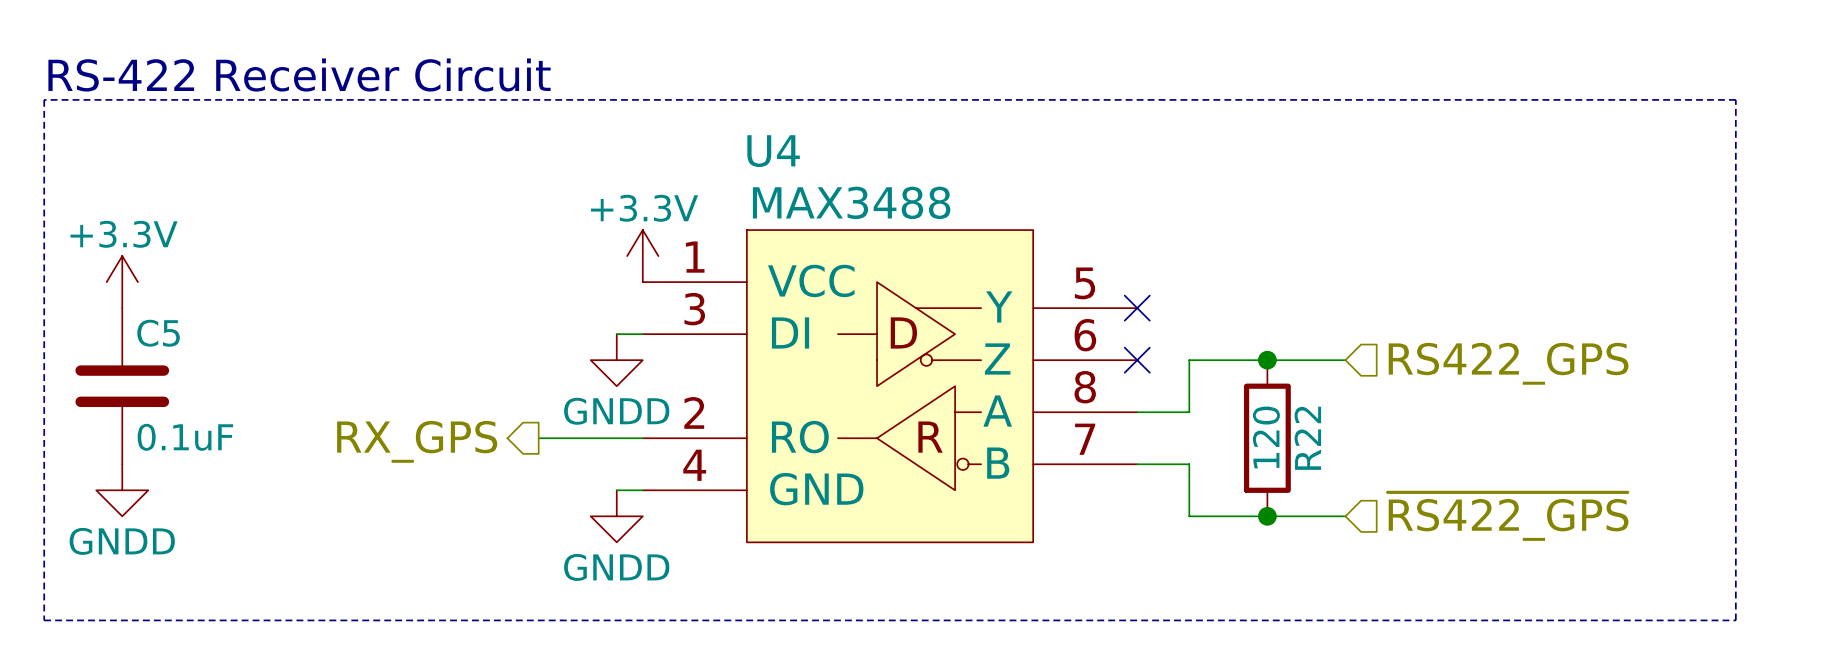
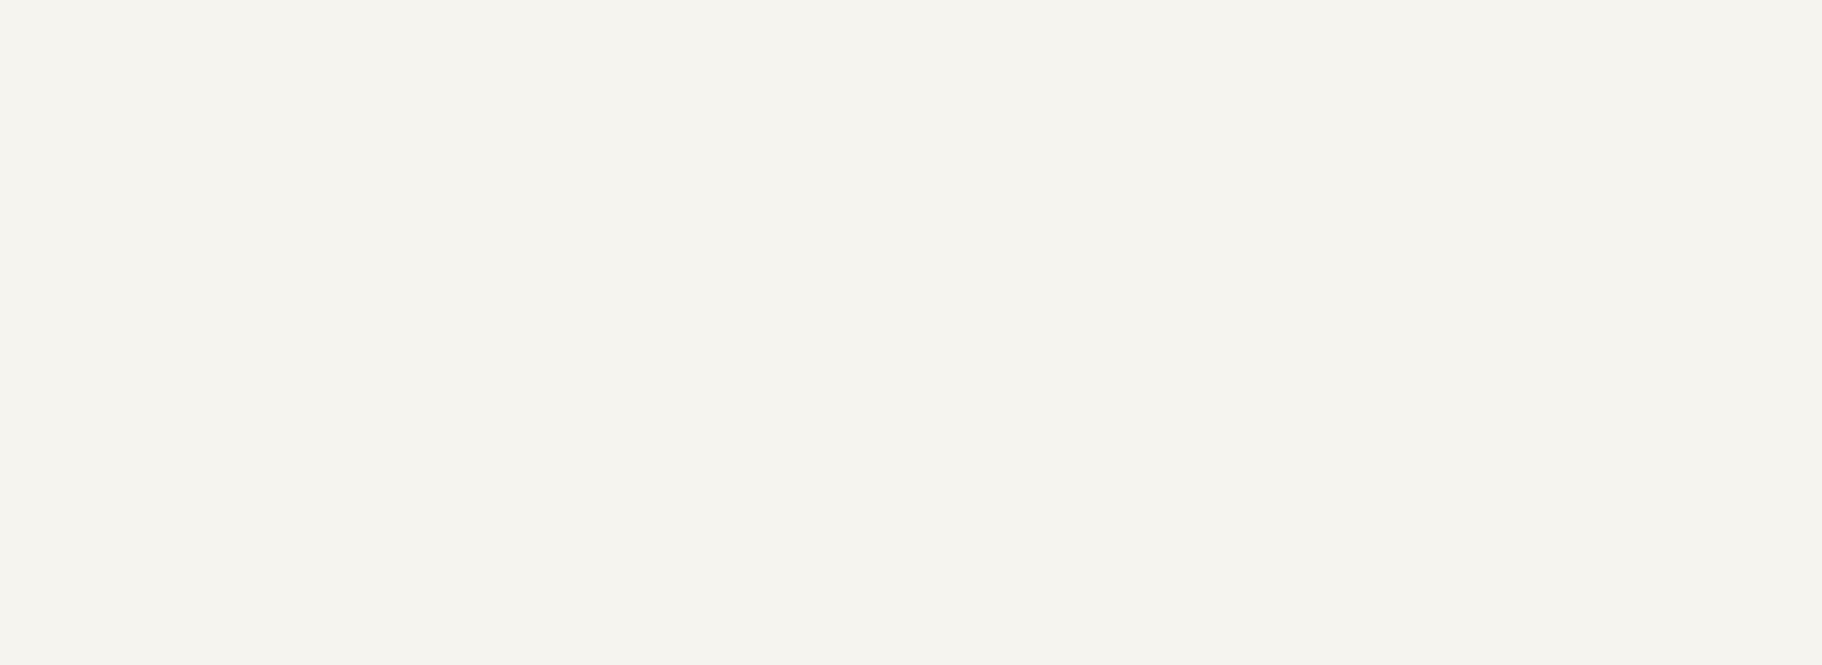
text: RS-422 Receiver Circuit (299, 75) -> none
line: (44, 99) (44, 620) (1735, 620) (1735, 99) (44, 99) -> none
power symbol: +3.3V (642, 256) -> none
power symbol: +3.3V (122, 282) -> none
no-connect mark: (1137, 308) -> none
wire: (616, 334) (642, 334) -> none
power symbol: GNDD (616, 360) -> none
no-connect mark: (1137, 360) -> none
junction: (1267, 360) -> none
wire: (1345, 360) (1189, 360) (1189, 412) (1137, 412) -> none
hierarchical label: RS422_GPS (1508, 363) -> none
C5: 0.1uF (122, 386) -> none
U4: MAX3488 (890, 386) -> none
wire: (538, 438) (642, 438) -> none
R22: 120 (1267, 438) -> none
hierarchical label: RX_GPS (417, 441) -> none
wire: (1137, 464) (1189, 464) (1189, 516) (1345, 516) -> none
power symbol: GNDD (122, 490) -> none
wire: (616, 490) (642, 490) -> none
power symbol: GNDD (616, 516) -> none
junction: (1267, 516) -> none
hierarchical label: ~{RS422_GPS} (1508, 516) -> none

